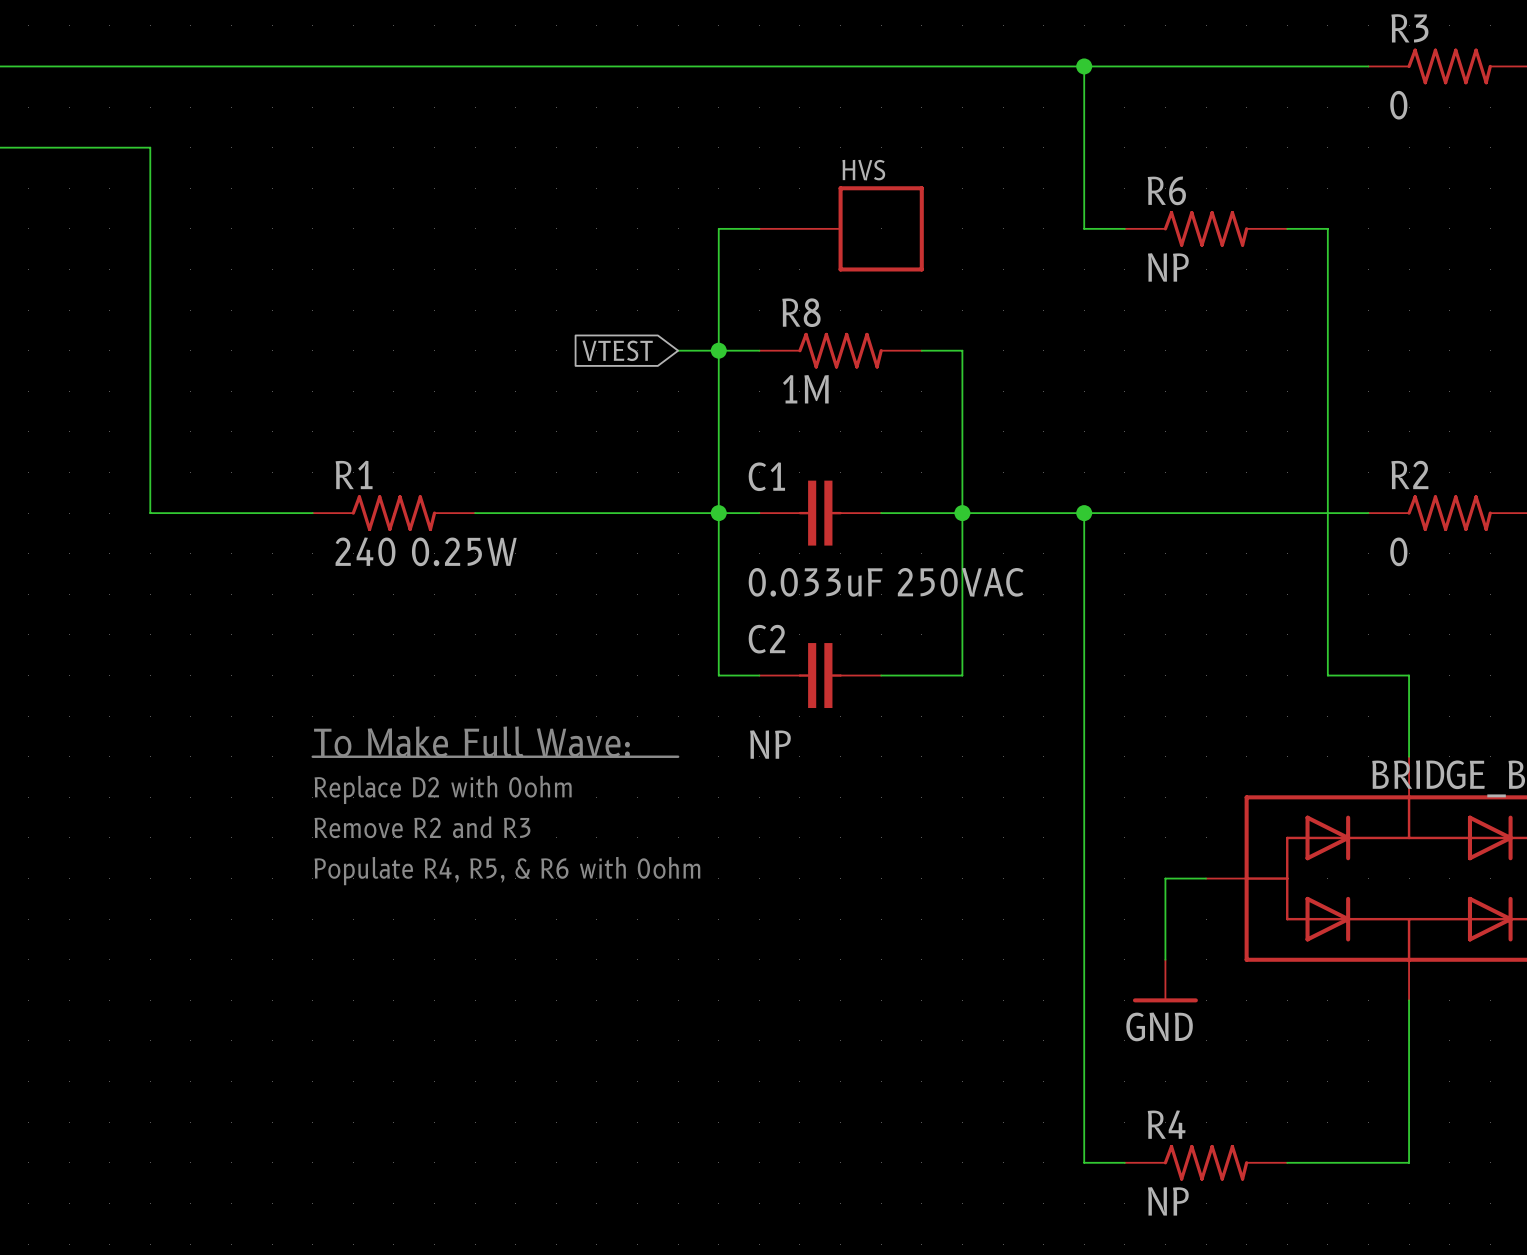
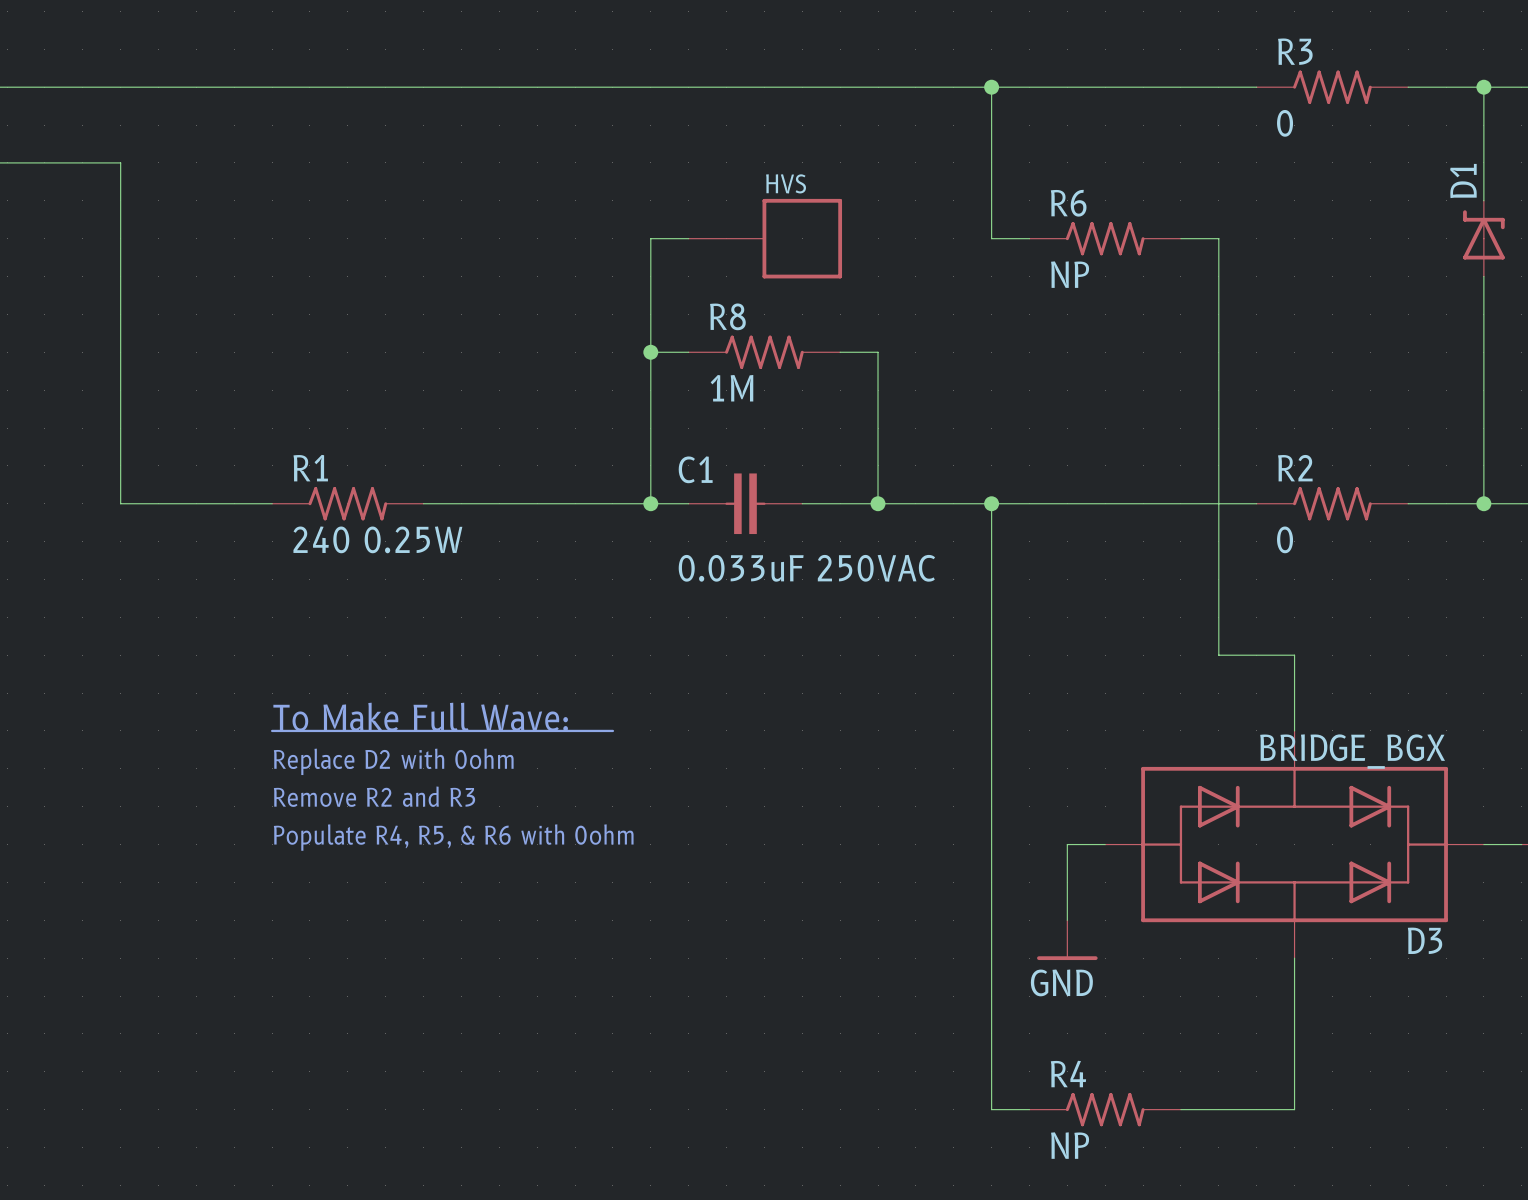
global label: VTEST (617, 350) -> none
wire: (678, 350) (718, 350) -> none
wire: (718, 513) (718, 675) (759, 675) -> none
wire: (962, 513) (962, 675) (881, 675) -> none
C2: NP (820, 675) -> none

